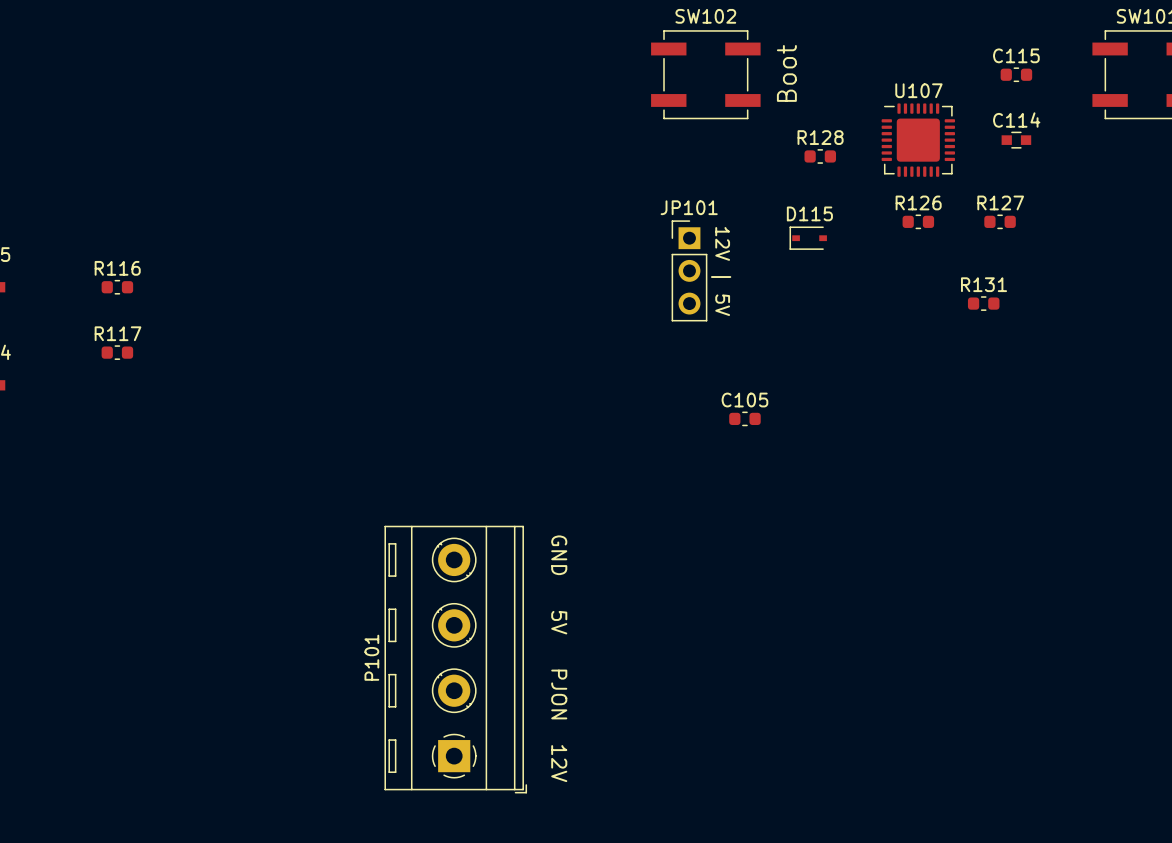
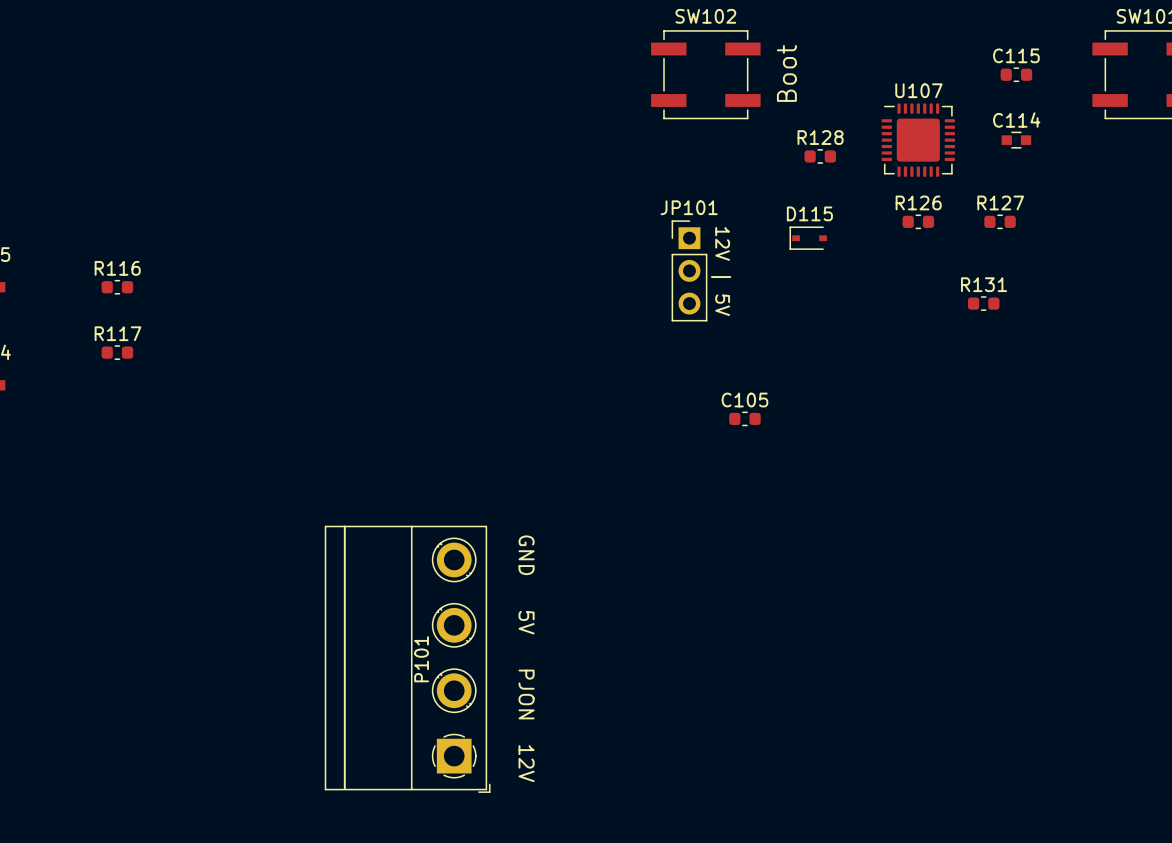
P101 footprint: [384, 525, 528, 794] -> [324, 525, 491, 793]
P101 name position: P101 (371, 657) -> P101 (421, 659)
text position: GND 5V PJON 12V (559, 658) -> GND 5V PJON 12V (526, 658)

